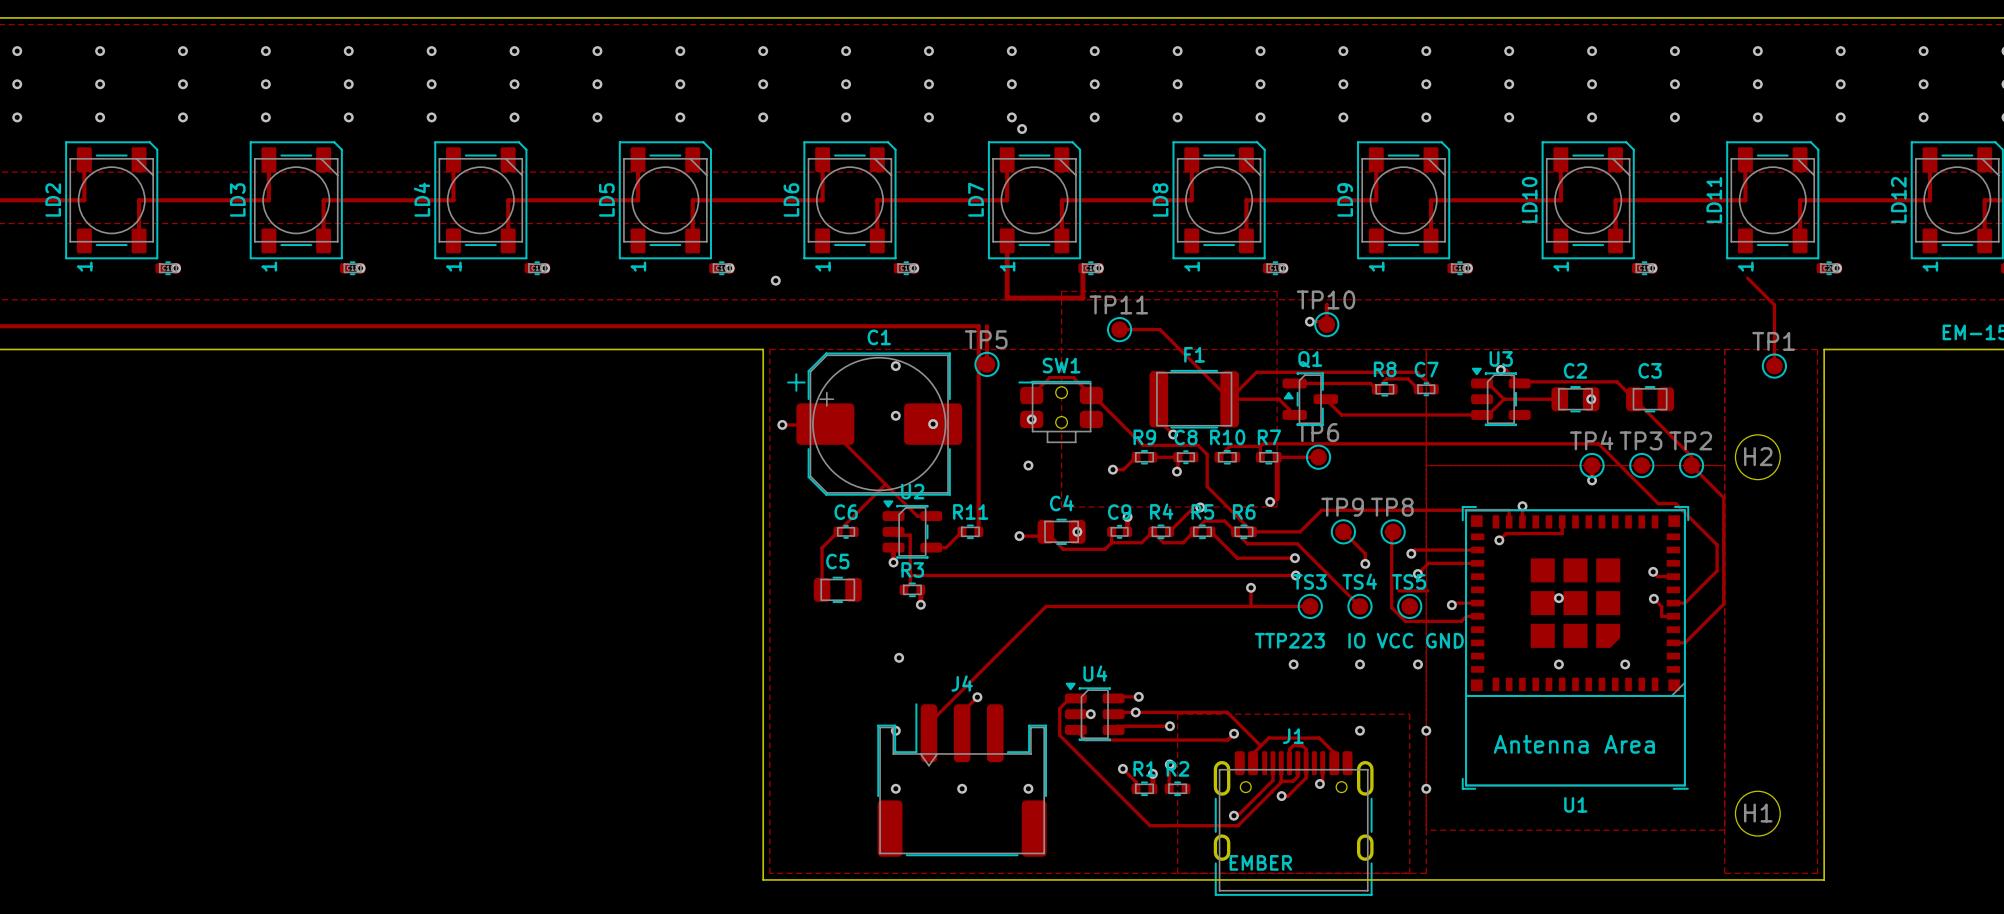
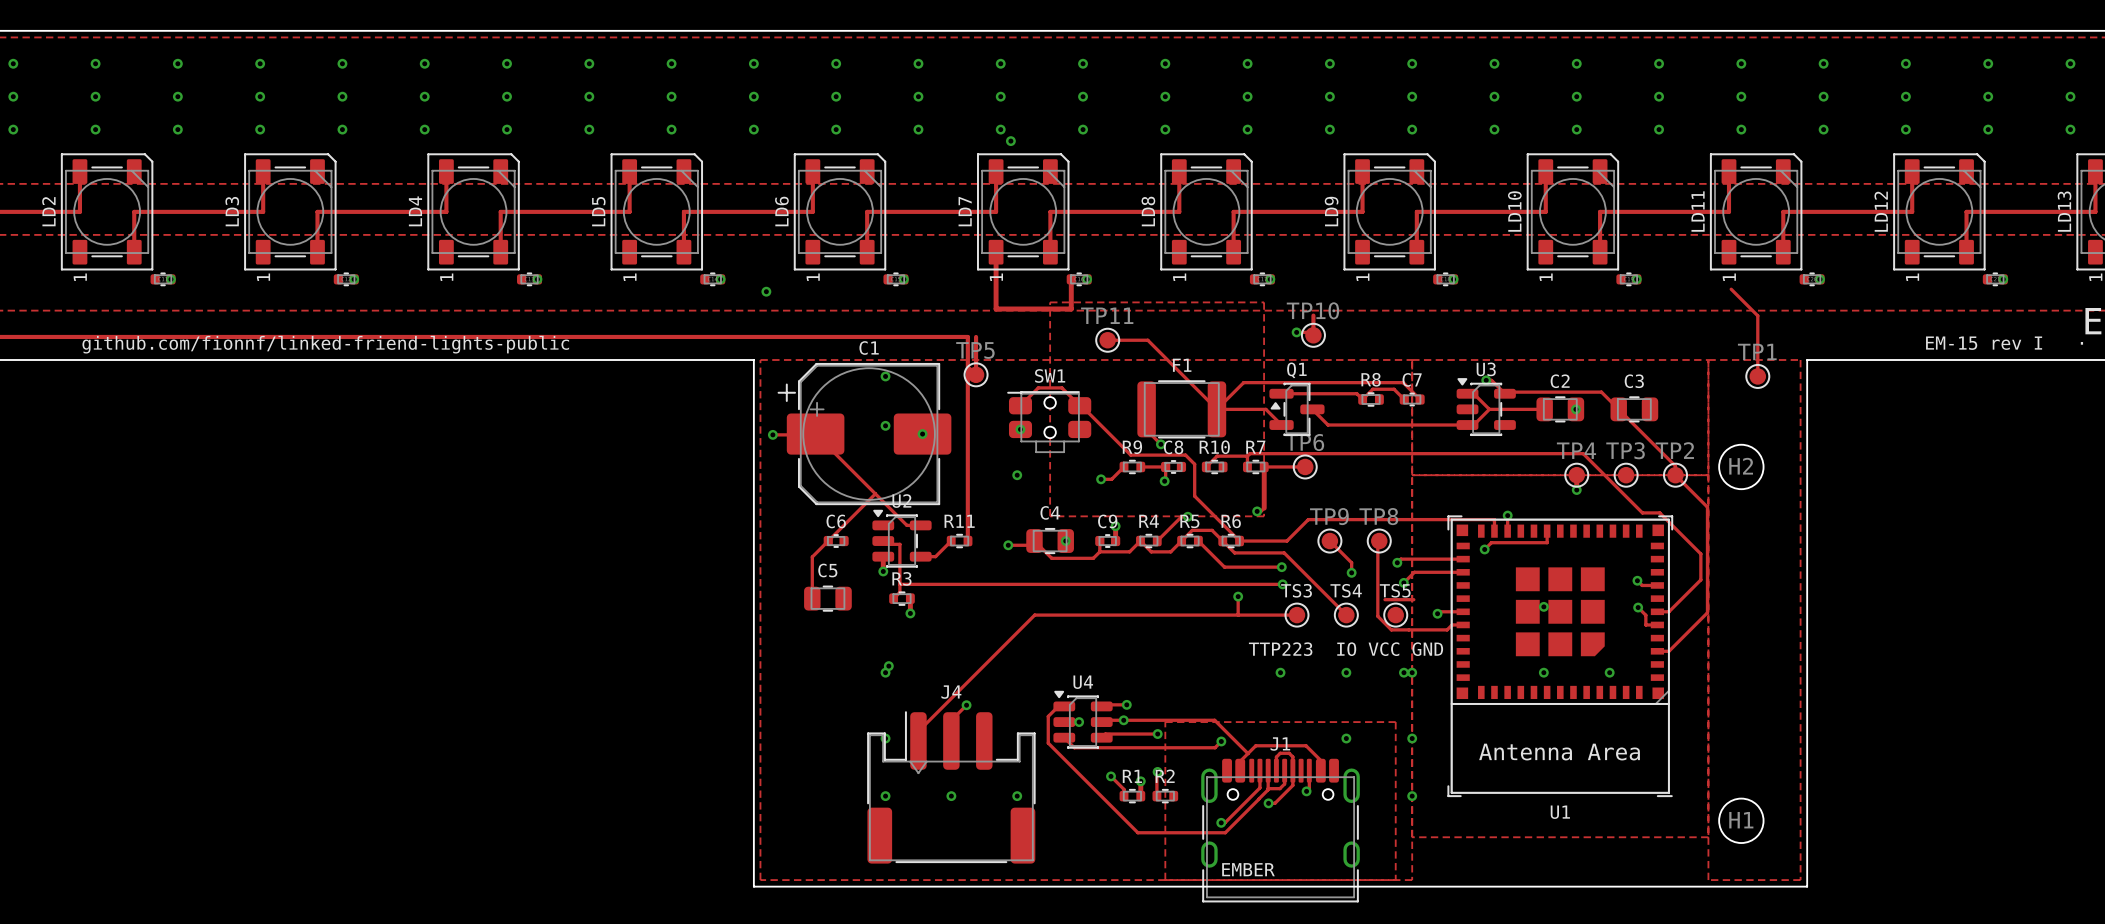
text: none -> github.com/fionnf/linked-friend-lights-public (325, 344)
via: none -> (885, 672)
via: none -> (1412, 672)

